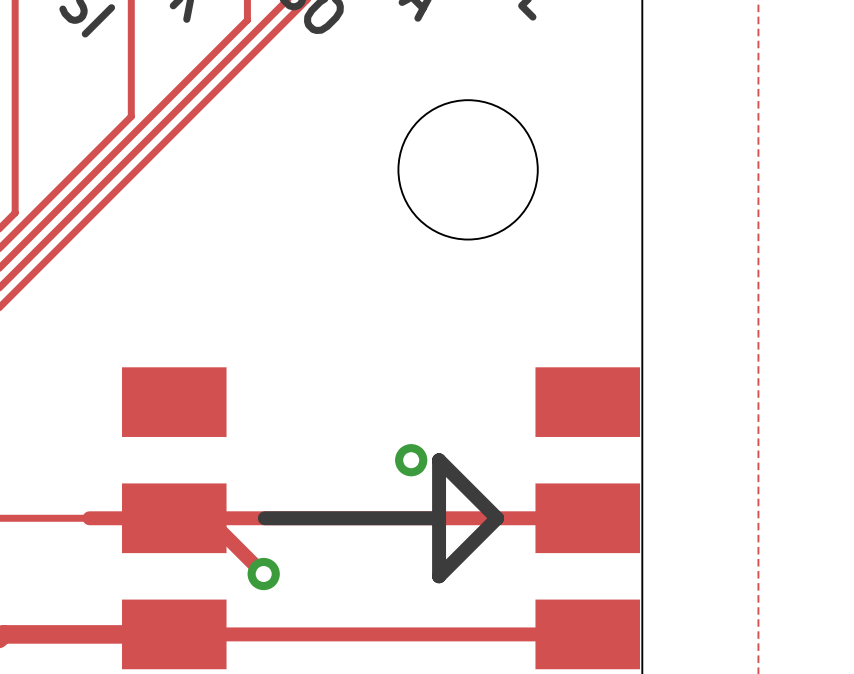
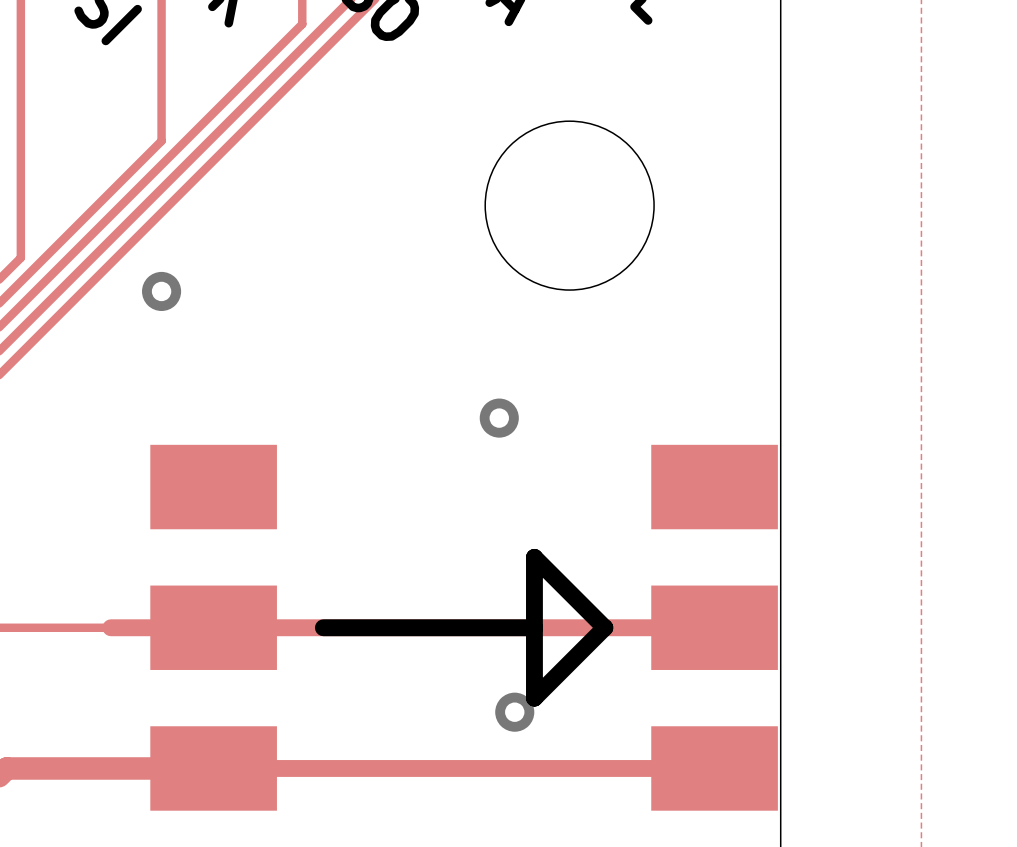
via: none -> (161, 291)
via: none -> (499, 418)
via: (411, 460) -> none
track: (207, 518) (263, 574) -> none
via: (263, 574) -> none
via: none -> (514, 712)

